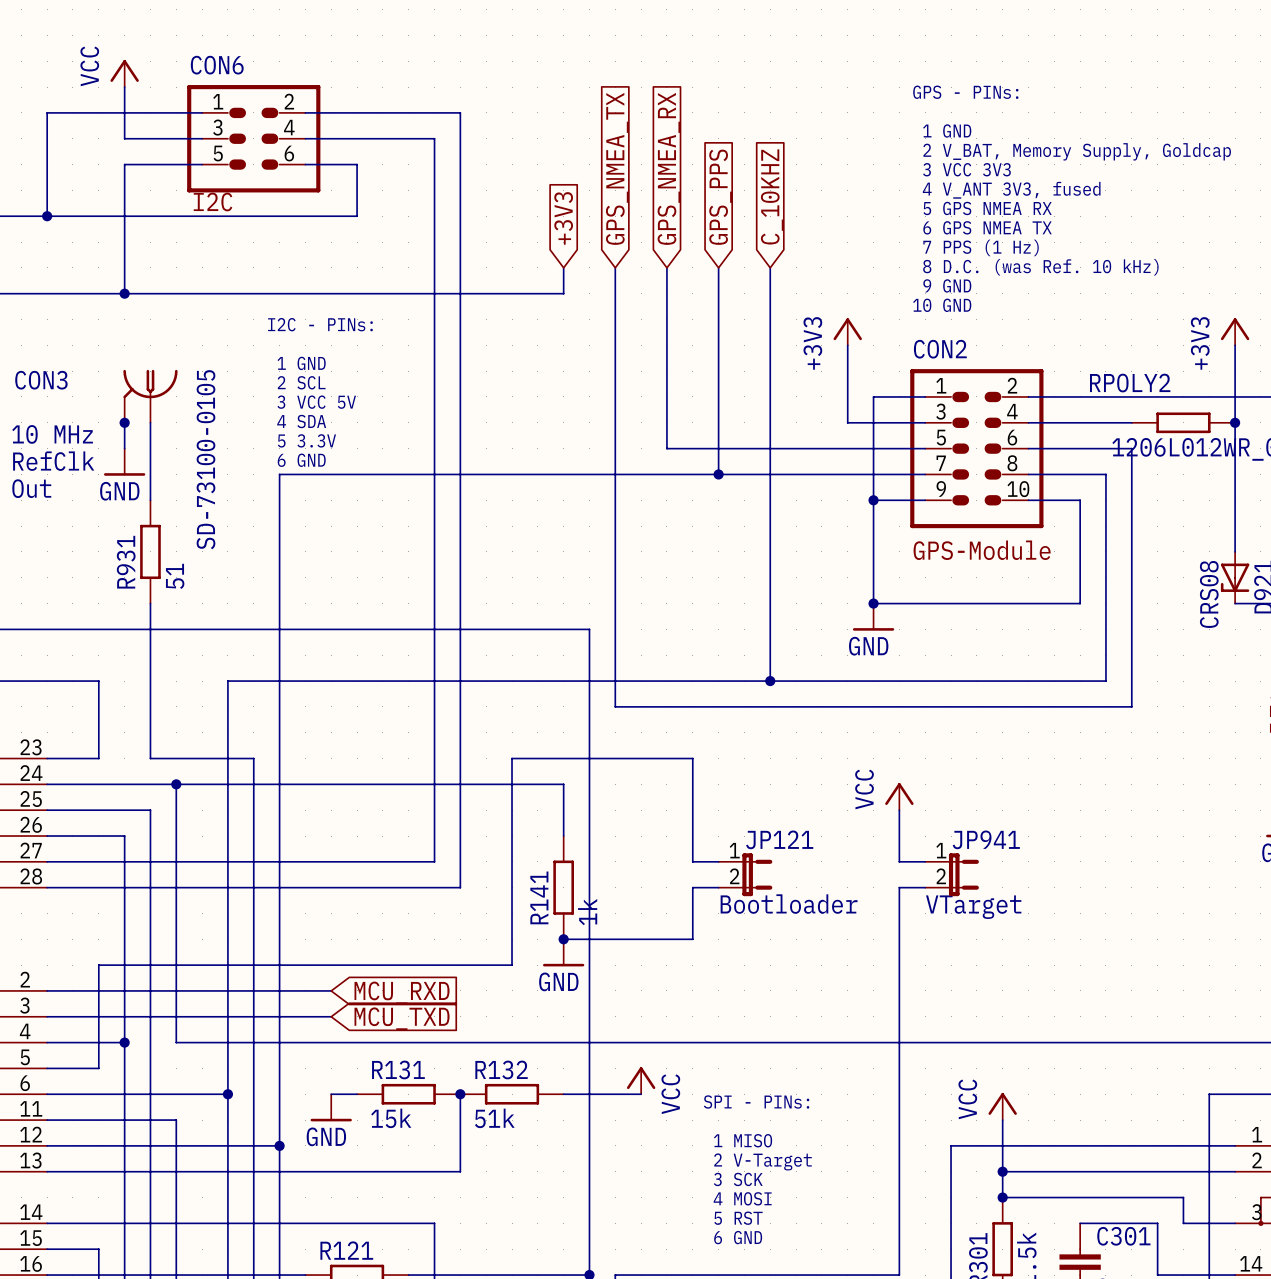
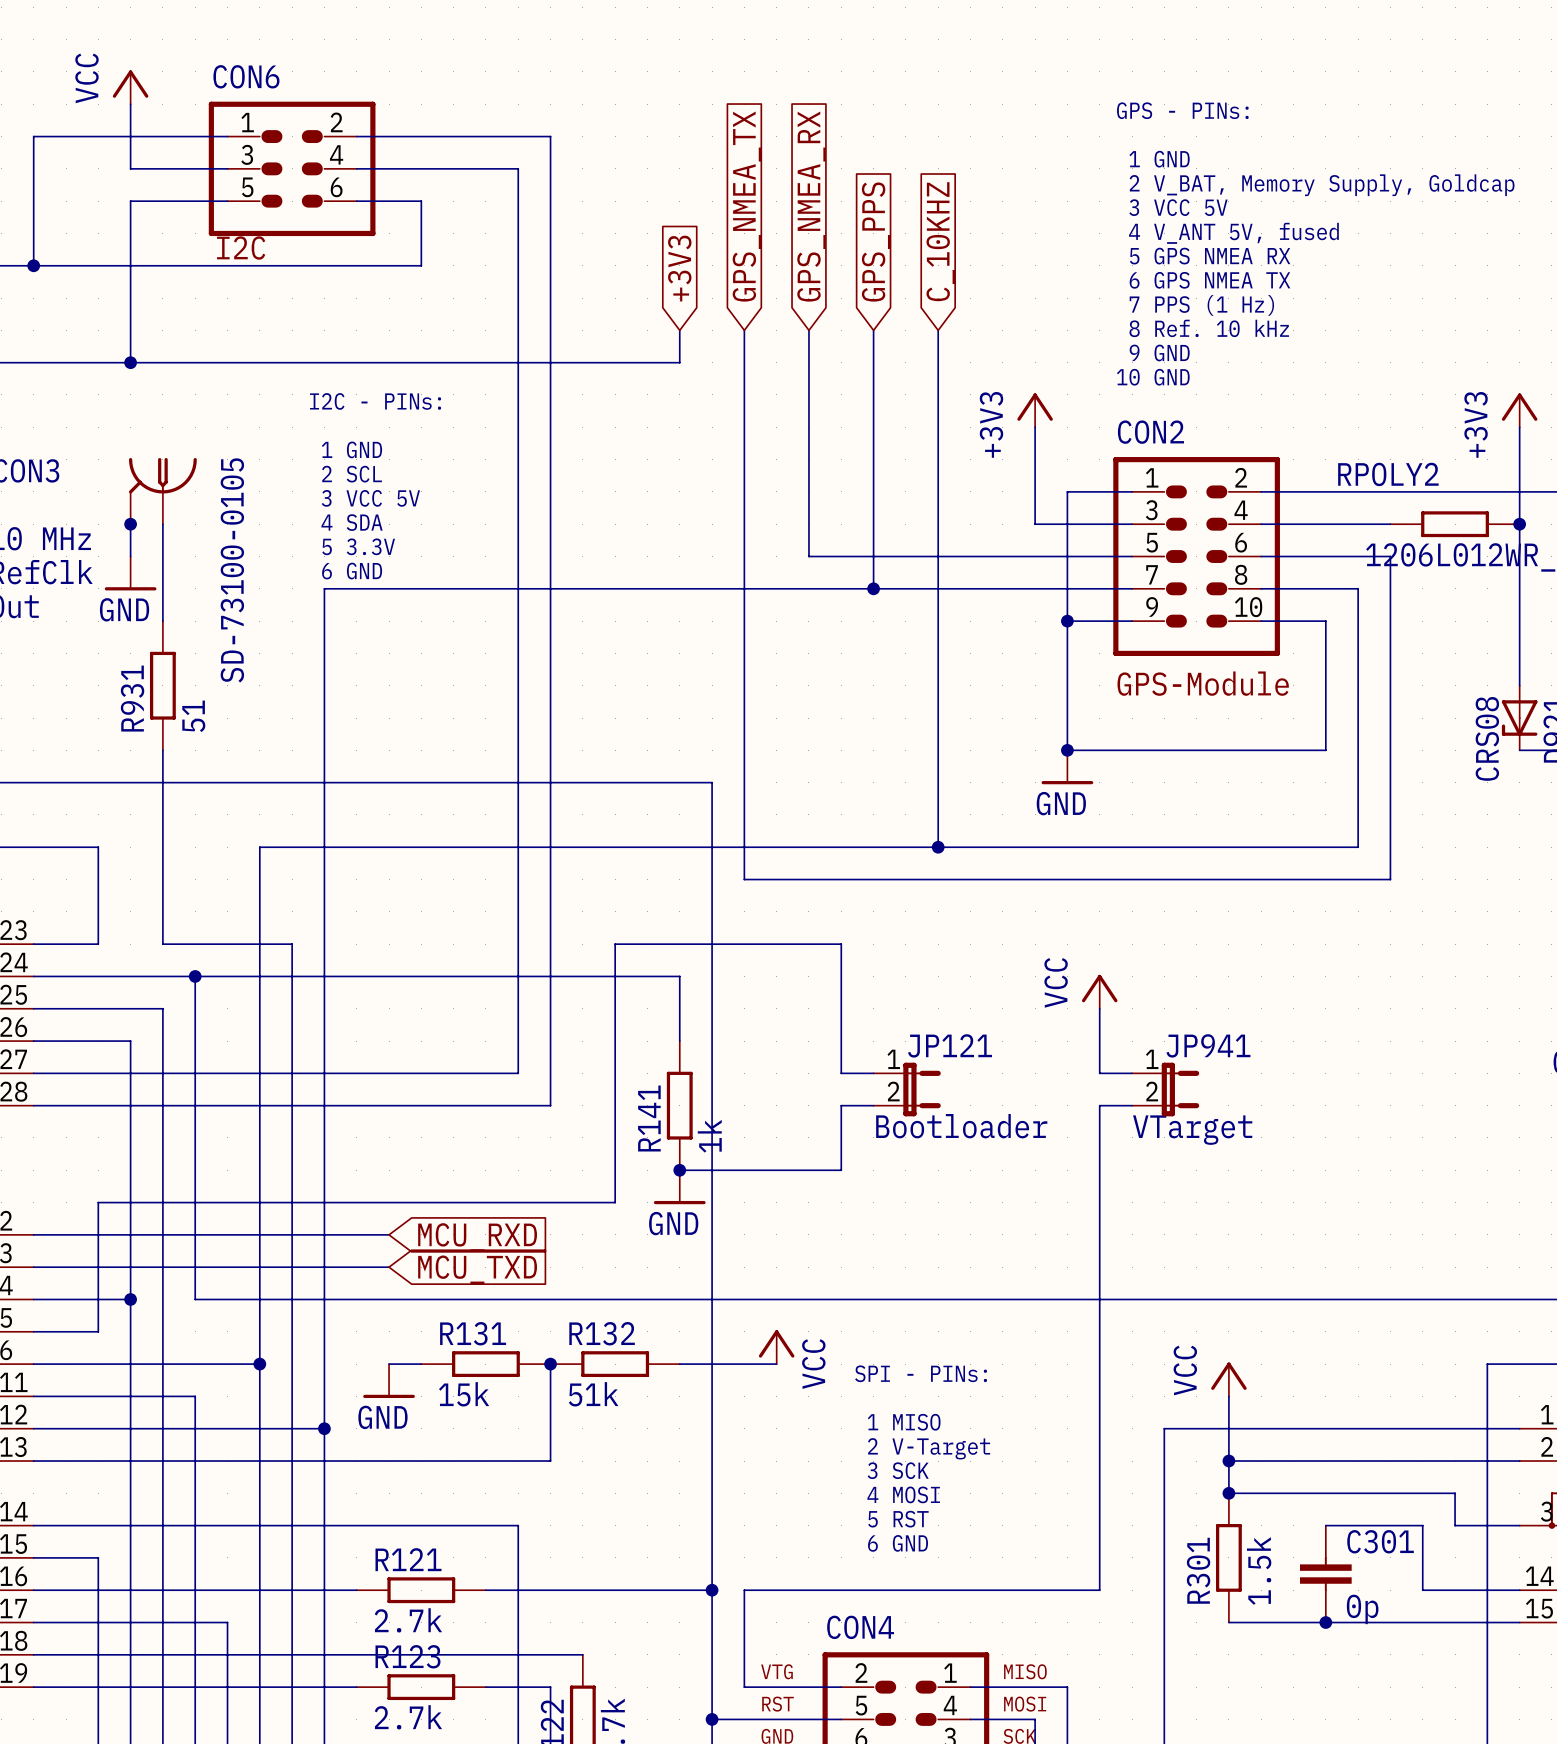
text: 3 VCC 3V3 (966, 169) -> 3 VCC 5V (1178, 207)
text: 4 V_ANT 3V3, fused (1011, 190) -> 4 V_ANT 5V, fused (1233, 233)
text: 8 D.C. (was Ref. 10 kHz) (1040, 267) -> 8 Ref. 10 kHz (1209, 328)

